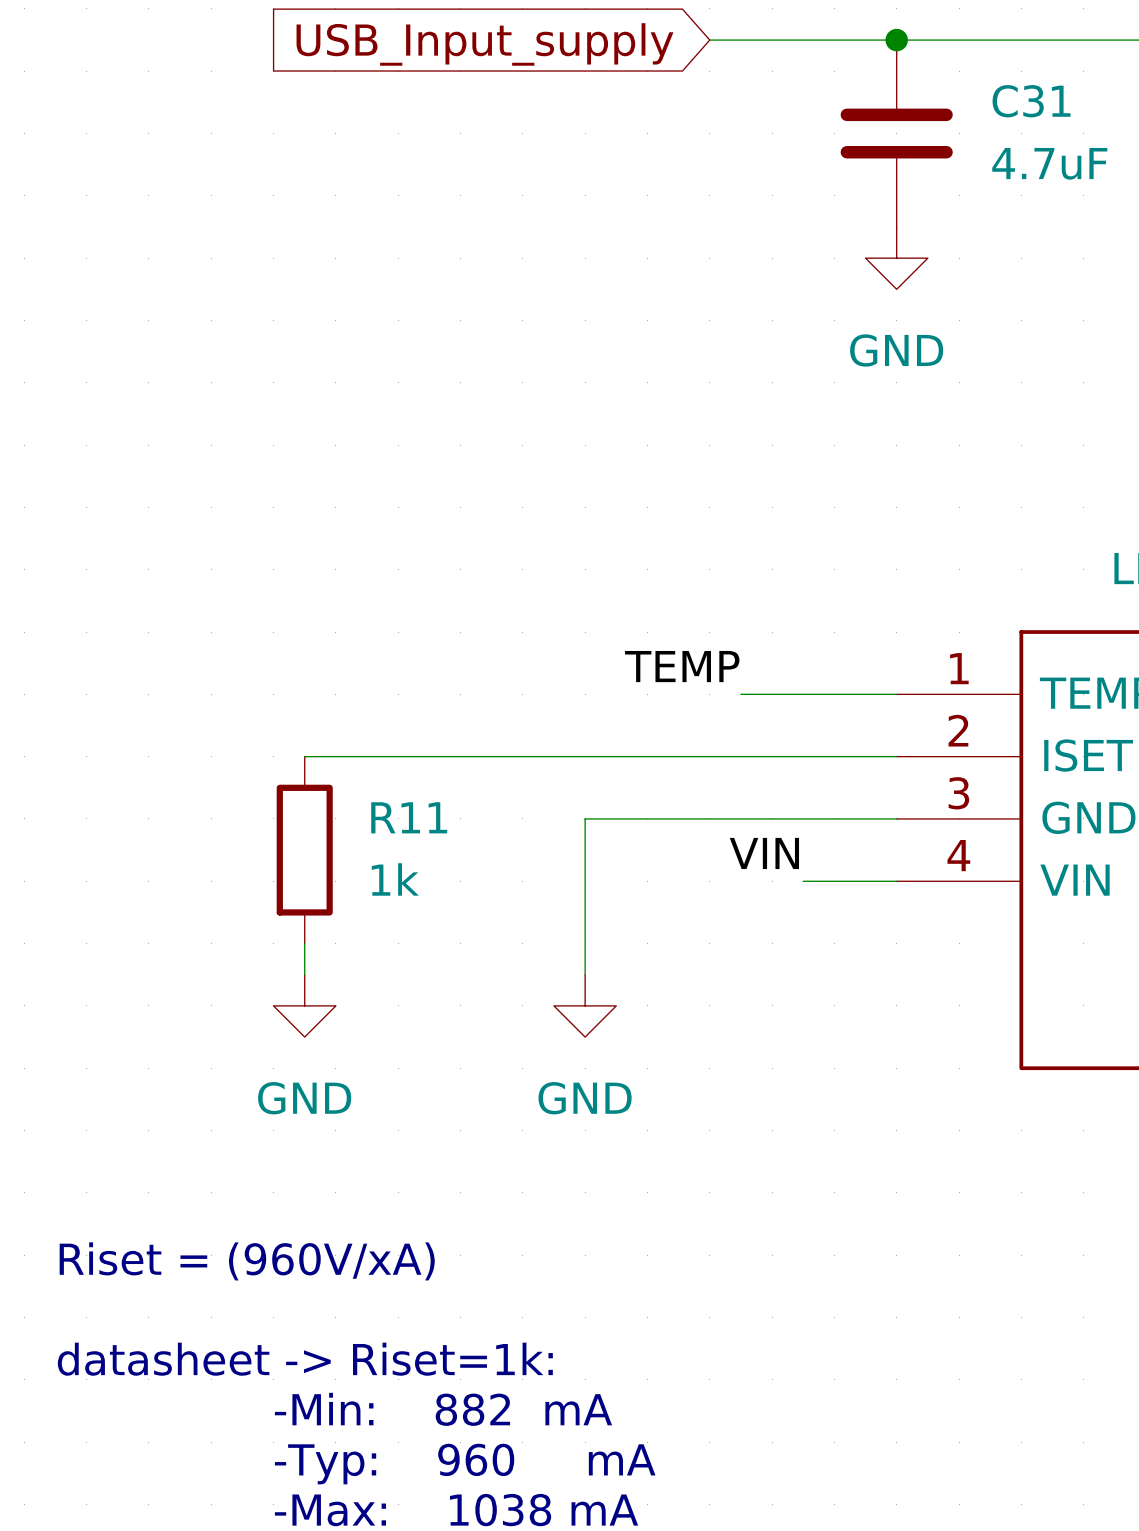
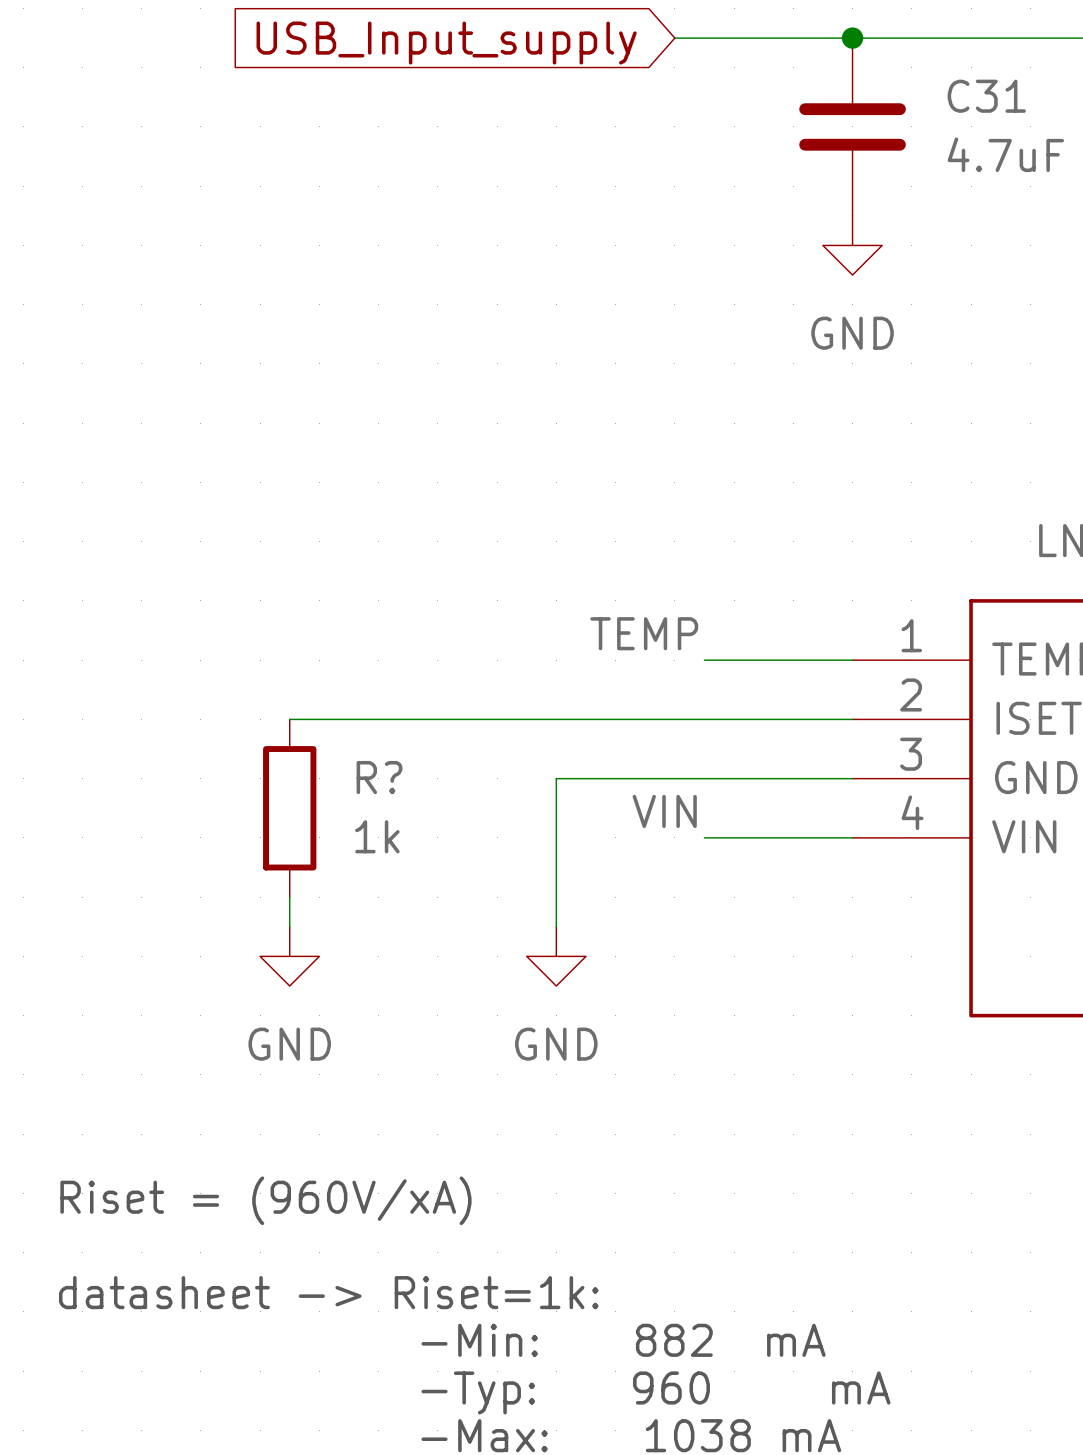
R11 name: R11 (409, 817) -> R? (379, 777)
label position: VIN (764, 853) -> VIN (664, 811)
wire: none -> (704, 837) (763, 837)

